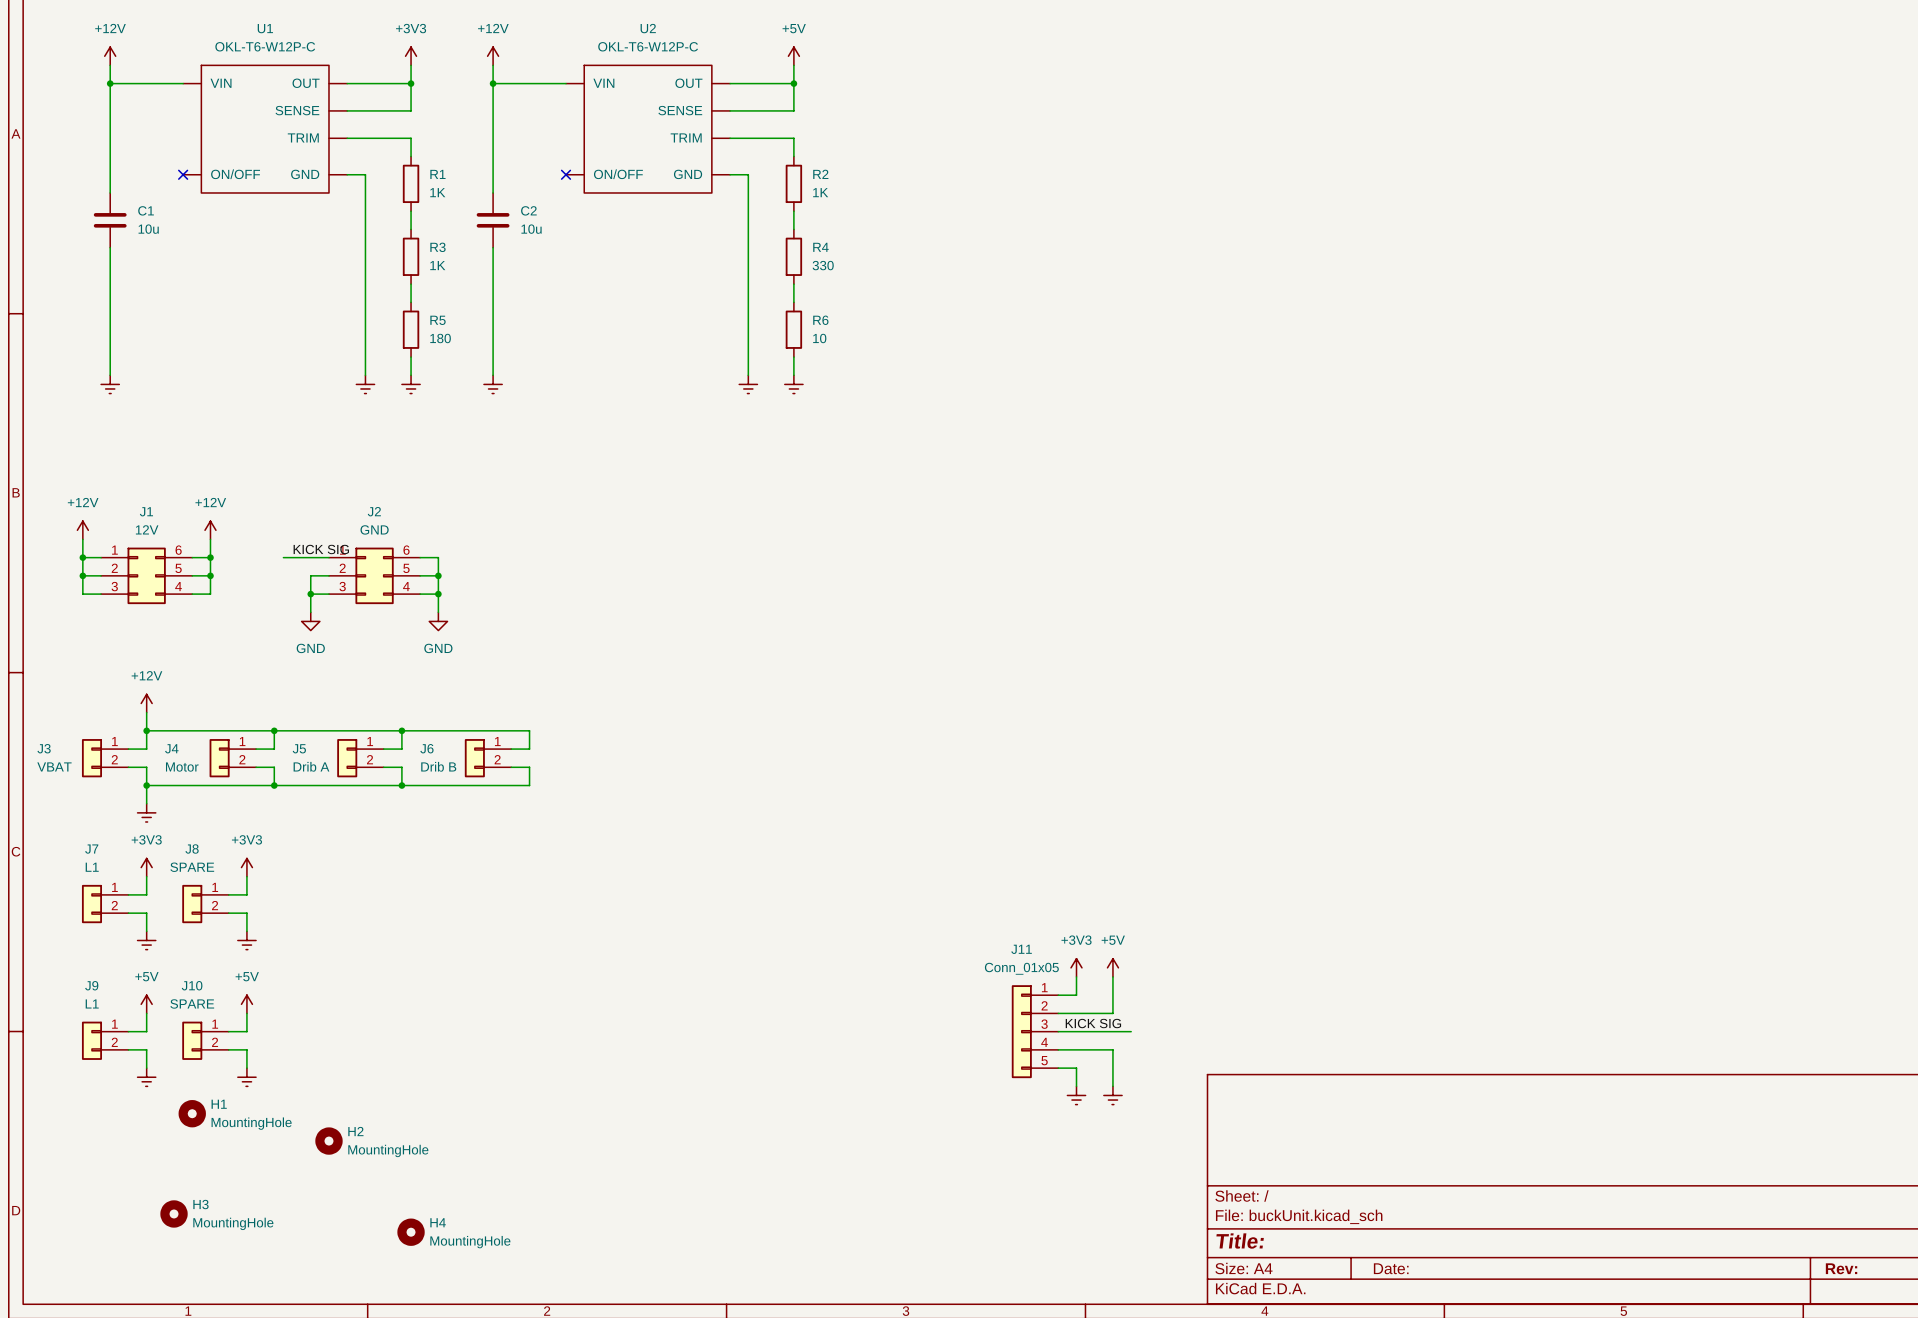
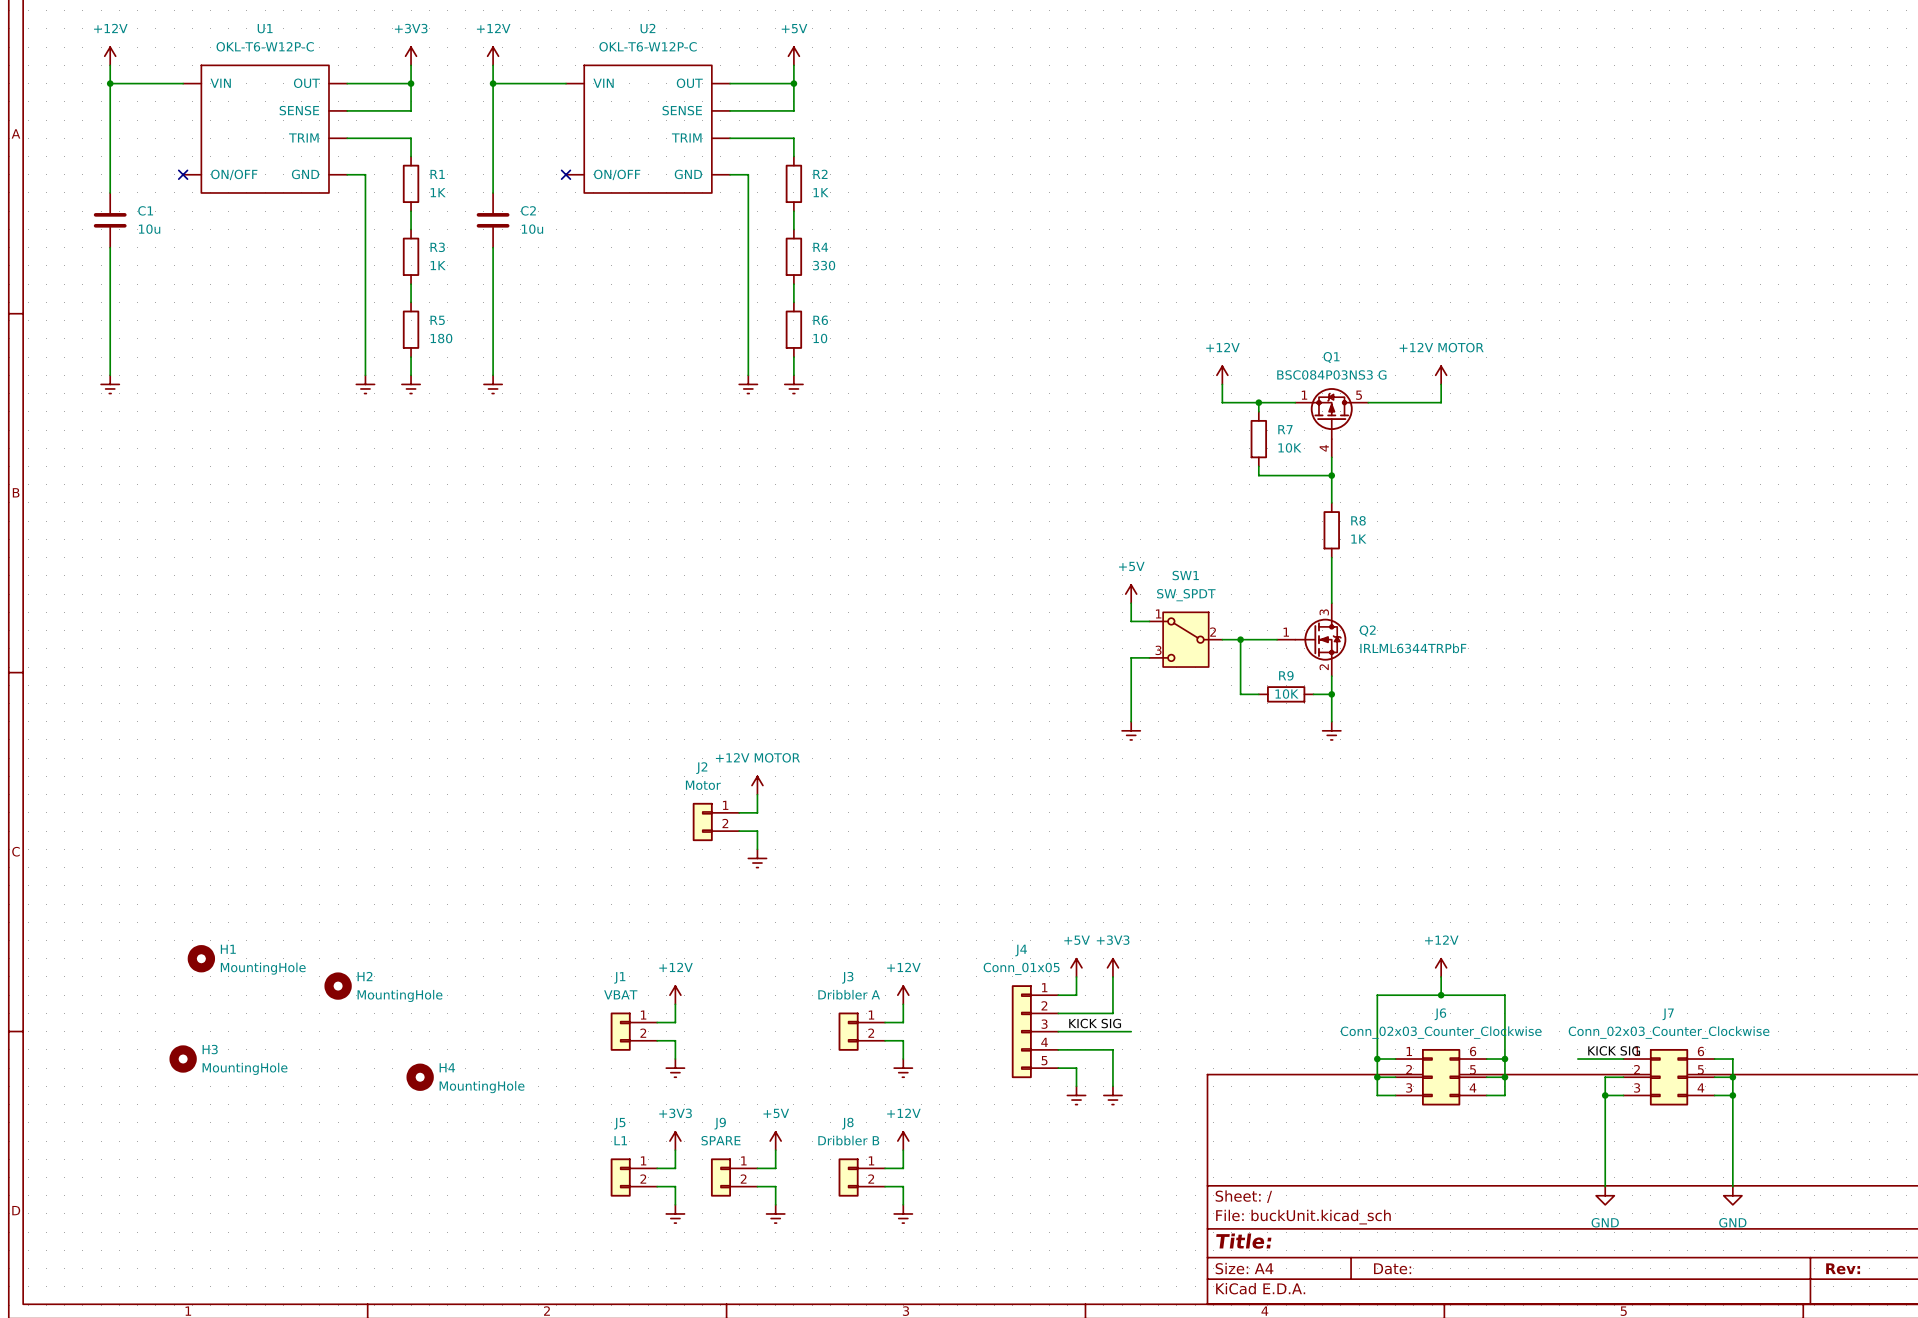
power symbol: none -> +12V (1222, 375)
power symbol: none -> +12V MOTOR (1441, 375)
wire: none -> (1222, 384) (1222, 402) (1295, 402)
wire: none -> (1441, 384) (1441, 402) (1368, 402)
wire: none -> (1258, 402) (1258, 411)
junction: none -> (1258, 402)
Q1: none -> BSC084P03NS3 G (1331, 422)
R7: none -> 10K (1258, 439)
wire: none -> (1331, 457) (1331, 502)
wire: none -> (1258, 466) (1258, 475) (1331, 475)
junction: none -> (1331, 475)
J1 name position: J1 (146, 511) -> J1 (619, 977)
J2 name position: J2 (374, 511) -> J2 (701, 768)
J1 value: 12V (147, 529) -> VBAT (620, 994)
J2 value: GND (374, 529) -> Motor (703, 785)
power symbol: +12V (82, 530) -> none
power symbol: +12V (210, 530) -> none
R8: none -> 1K (1331, 530)
wire: (82, 539) (82, 594) (101, 594) -> none
wire: (210, 539) (210, 594) (192, 594) -> none
J1 symbol: [101, 547, 193, 605] -> [610, 1012, 658, 1051]
J2 symbol: [328, 547, 421, 605] -> [692, 802, 740, 842]
label: KICK SIG (321, 549) -> none
wire: (82, 557) (101, 557) -> none
junction: (82, 557) -> none
wire: (192, 557) (210, 557) -> none
junction: (210, 557) -> none
wire: (283, 557) (328, 557) -> none
wire: (420, 557) (438, 557) (438, 612) -> none
wire: none -> (1331, 557) (1331, 603)
wire: (82, 575) (101, 575) -> none
junction: (82, 575) -> none
wire: (192, 575) (210, 575) -> none
junction: (210, 575) -> none
wire: (328, 575) (310, 575) (310, 612) -> none
wire: (420, 575) (438, 575) -> none
junction: (438, 575) -> none
wire: (310, 594) (328, 594) -> none
junction: (310, 594) -> none
wire: (420, 594) (438, 594) -> none
junction: (438, 594) -> none
power symbol: none -> +5V (1131, 594)
wire: none -> (1131, 603) (1131, 621) (1149, 621)
power symbol: GND (310, 621) -> none
power symbol: GND (438, 621) -> none
SW1: none -> SW_SPDT (1185, 639)
wire: none -> (1222, 639) (1277, 639)
wire: none -> (1240, 639) (1240, 694) (1258, 694)
junction: none -> (1240, 639)
Q2: none -> IRLML6344TRPbF (1311, 639)
wire: none -> (1149, 657) (1131, 657) (1131, 721)
wire: none -> (1331, 676) (1331, 721)
R9: none -> 10K (1286, 694)
wire: none -> (1313, 694) (1331, 694)
junction: none -> (1331, 694)
power symbol: +12V (146, 703) -> none
wire: (146, 712) (146, 749) (128, 749) -> none
wire: (146, 730) (529, 730) (529, 749) (511, 749) -> none
junction: (146, 730) -> none
wire: (274, 730) (274, 749) (256, 749) -> none
junction: (274, 730) -> none
wire: (401, 730) (401, 749) (383, 749) -> none
junction: (401, 730) -> none
power symbol: none -> (1131, 730)
power symbol: none -> (1331, 730)
J6 symbol: [464, 739, 512, 778] -> [1395, 1048, 1487, 1106]
J3 name position: J3 (44, 748) -> J3 (847, 977)
J5 name position: J5 (299, 748) -> J5 (619, 1123)
J6 name position: J6 (426, 748) -> J6 (1440, 1014)
J3 position: (105, 758) -> (861, 1031)
J4: Motor (232, 758) -> none
J5 position: (360, 758) -> (633, 1177)
J3 value: VBAT (54, 766) -> Dribbler A (849, 994)
J5 value: Drib A (311, 766) -> L1 (620, 1140)
J6 value: Drib B (438, 766) -> Conn_02x03_Counter_Clockwise (1441, 1032)
wire: (128, 767) (146, 767) (146, 803) -> none
wire: (256, 767) (274, 767) (274, 785) -> none
wire: (383, 767) (401, 767) (401, 785) -> none
wire: (511, 767) (529, 767) (529, 785) (146, 785) -> none
junction: (146, 785) -> none
junction: (274, 785) -> none
junction: (401, 785) -> none
power symbol: none -> +12V MOTOR (757, 785)
wire: none -> (757, 794) (757, 812) (739, 812)
power symbol: (146, 812) -> none
wire: none -> (739, 831) (757, 831) (757, 849)
J7 name position: J7 (91, 849) -> J7 (1668, 1014)
power symbol: none -> (757, 858)
J7 value: L1 (92, 867) -> Conn_02x03_Counter_Clockwise (1669, 1032)
power symbol: +3V3 (146, 867) -> none
J8 value: SPARE (192, 867) -> Dribbler B (848, 1140)
power symbol: +3V3 (246, 867) -> none
wire: (146, 876) (146, 894) (128, 894) -> none
wire: (246, 876) (246, 894) (228, 894) -> none
J7 symbol: [81, 884, 129, 924] -> [1623, 1048, 1715, 1106]
J8 position: (205, 904) -> (861, 1177)
wire: (128, 913) (146, 913) (146, 931) -> none
wire: (228, 913) (246, 913) (246, 931) -> none
power symbol: (146, 940) -> none
power symbol: (246, 940) -> none
J11 name: J11 (1021, 949) -> J4 (1021, 950)
power symbol: +3V3 (1076, 967) -> +5V (1076, 967)
power symbol: +5V (1112, 967) -> +3V3 (1112, 967)
power symbol: none -> +12V (1441, 967)
wire: none -> (1441, 976) (1441, 995)
power symbol: none -> +12V (675, 995)
power symbol: none -> +12V (903, 995)
junction: none -> (1441, 995)
J9 value: L1 (92, 1003) -> SPARE (720, 1140)
power symbol: +5V (146, 1004) -> none
power symbol: +5V (246, 1004) -> none
wire: none -> (675, 1004) (675, 1022) (657, 1022)
wire: none -> (903, 1004) (903, 1022) (885, 1022)
wire: (146, 1013) (146, 1031) (128, 1031) -> none
wire: (246, 1013) (246, 1031) (228, 1031) -> none
J9 position: (105, 1040) -> (734, 1177)
J10: SPARE (205, 1040) -> none
wire: none -> (657, 1040) (675, 1040) (675, 1059)
wire: none -> (885, 1040) (903, 1040) (903, 1059)
wire: (128, 1049) (146, 1049) (146, 1068) -> none
wire: (228, 1049) (246, 1049) (246, 1068) -> none
label: none -> KICK SIG (1614, 1050)
wire: none -> (1377, 1059) (1395, 1059)
junction: none -> (1377, 1059)
wire: none -> (1486, 1059) (1504, 1059)
junction: none -> (1504, 1059)
wire: none -> (1577, 1059) (1623, 1059)
wire: none -> (1714, 1059) (1732, 1059) (1732, 1186)
power symbol: none -> (675, 1068)
power symbol: none -> (903, 1068)
power symbol: (146, 1077) -> none
power symbol: (246, 1077) -> none
wire: none -> (1377, 1077) (1395, 1077)
junction: none -> (1377, 1077)
wire: none -> (1486, 1077) (1504, 1077)
junction: none -> (1504, 1077)
wire: none -> (1623, 1077) (1605, 1077) (1605, 1186)
wire: none -> (1714, 1077) (1732, 1077)
junction: none -> (1732, 1077)
wire: none -> (1395, 1095) (1377, 1095) (1377, 995) (1504, 995) (1504, 1095) (1486, 1095)
wire: none -> (1605, 1095) (1623, 1095)
junction: none -> (1605, 1095)
wire: none -> (1714, 1095) (1732, 1095)
junction: none -> (1732, 1095)
H1 position: (192, 1113) -> (201, 958)
H2 position: (328, 1141) -> (338, 986)
power symbol: none -> +3V3 (675, 1141)
power symbol: none -> +5V (775, 1141)
power symbol: none -> +12V (903, 1141)
wire: none -> (675, 1150) (675, 1168) (657, 1168)
wire: none -> (775, 1150) (775, 1168) (757, 1168)
wire: none -> (903, 1150) (903, 1168) (885, 1168)
wire: none -> (657, 1186) (675, 1186) (675, 1204)
wire: none -> (757, 1186) (775, 1186) (775, 1204)
wire: none -> (885, 1186) (903, 1186) (903, 1204)
power symbol: none -> GND (1605, 1195)
power symbol: none -> GND (1732, 1195)
H3 position: (174, 1213) -> (183, 1059)
power symbol: none -> (675, 1213)
power symbol: none -> (775, 1213)
power symbol: none -> (903, 1213)
H4 position: (411, 1232) -> (420, 1077)

